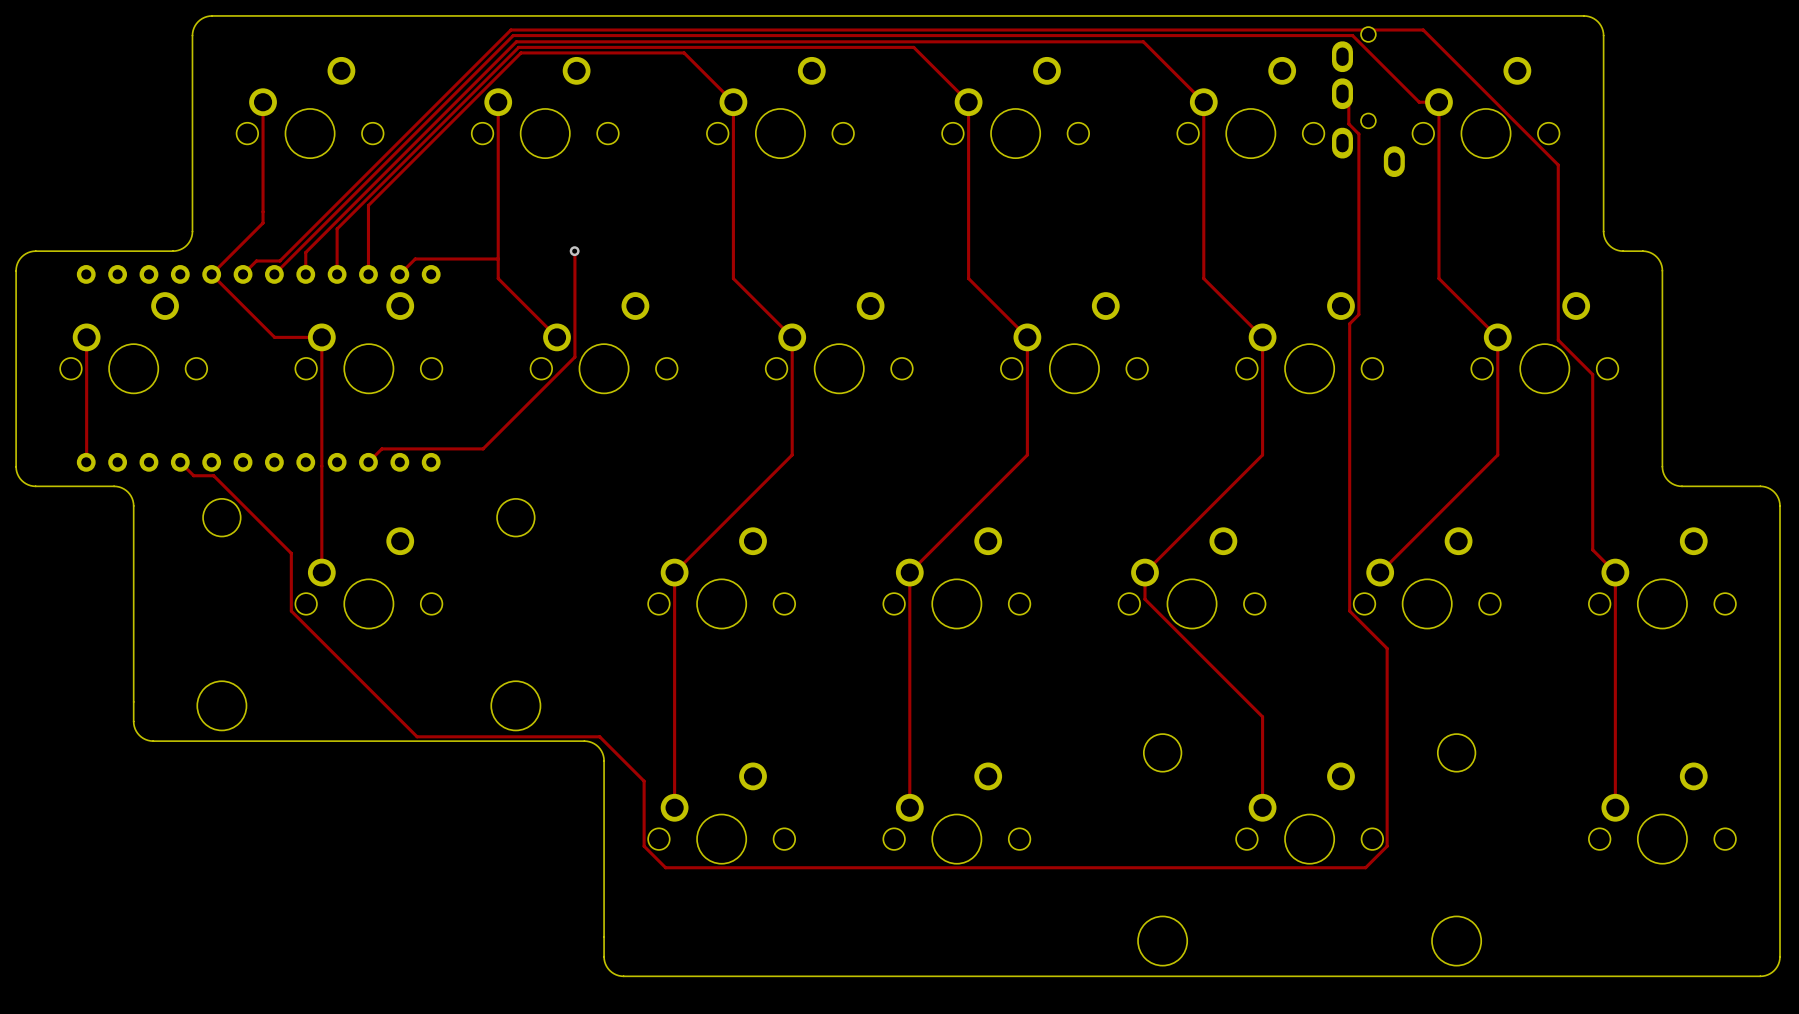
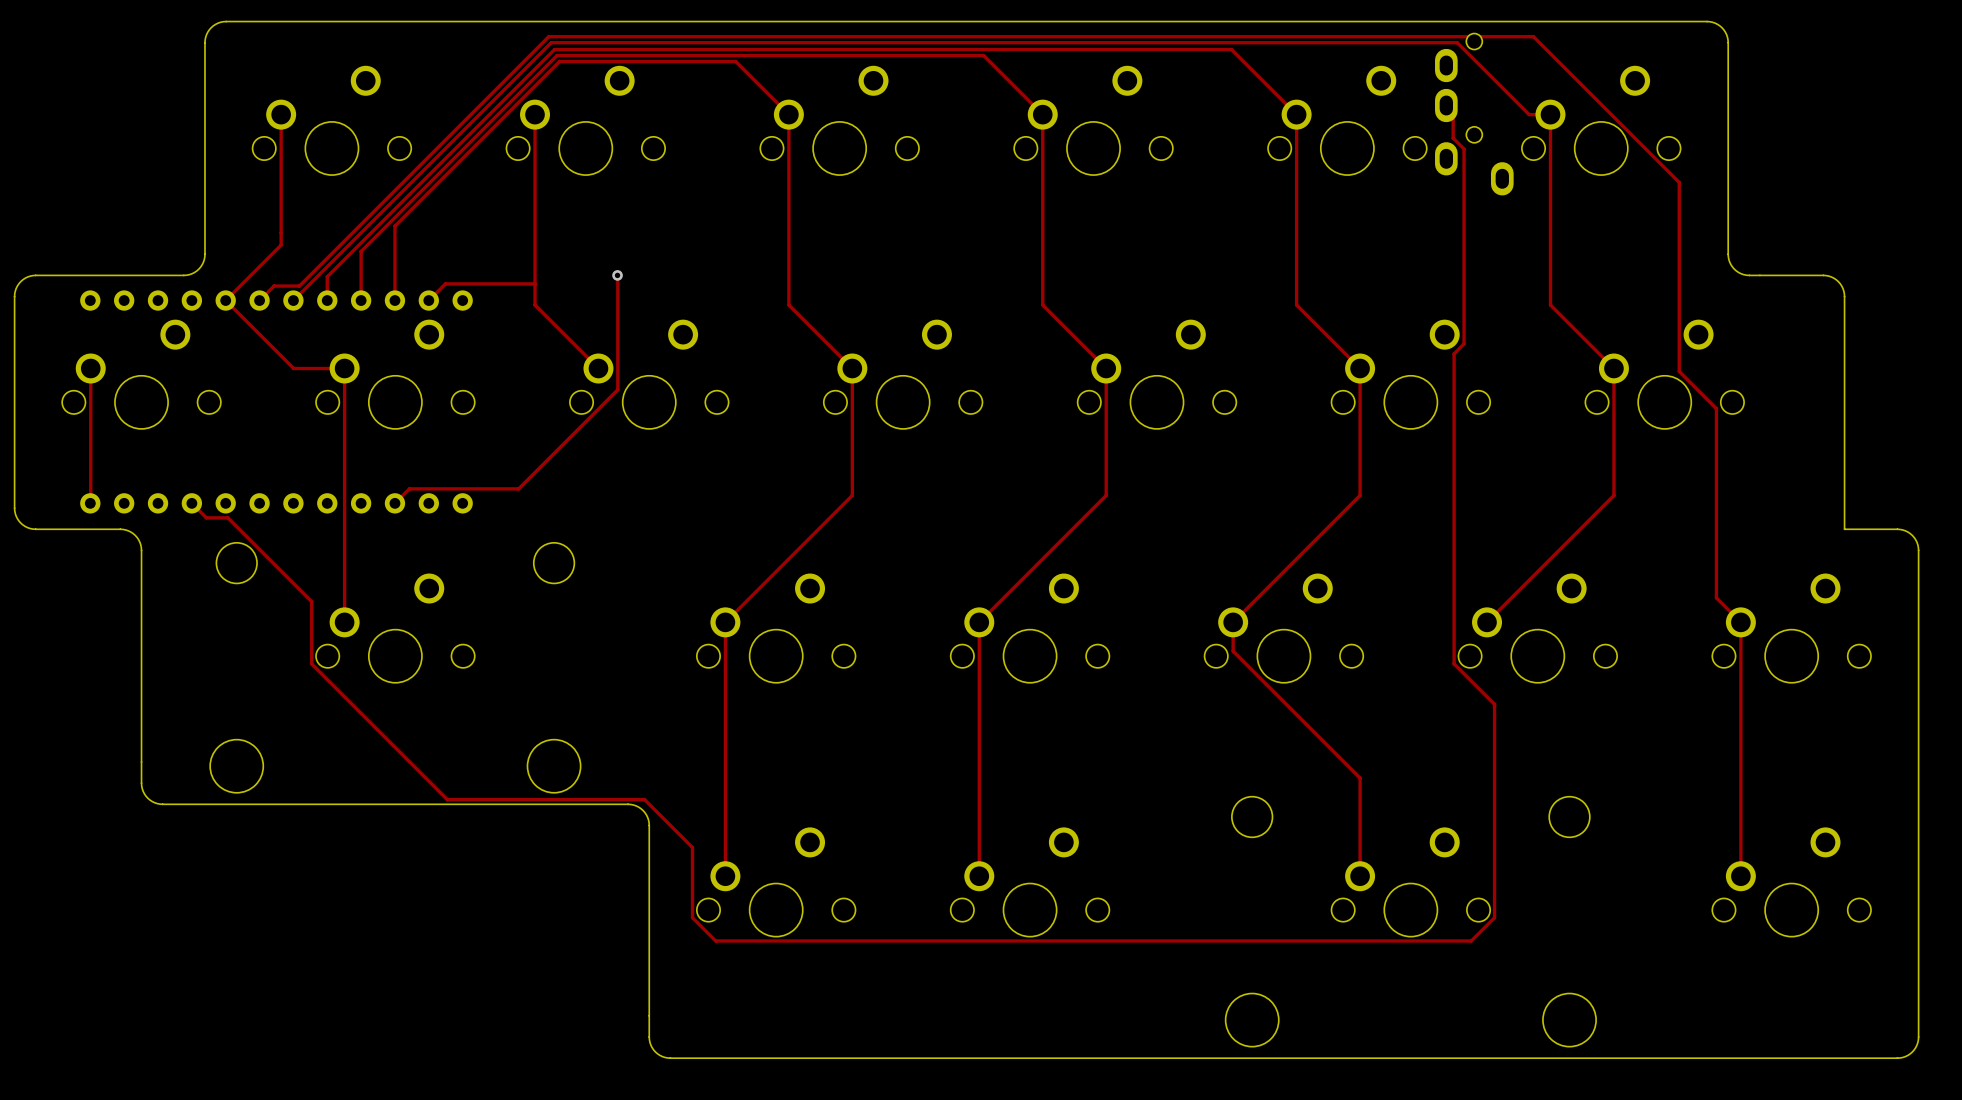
board edge: (1642, 251) (1656, 256) (1662, 268) (1663, 471) (1668, 480) (1676, 485) (1711, 486) -> (1770, 275) (1828, 276) (1838, 281) (1843, 291) (1844, 529)

